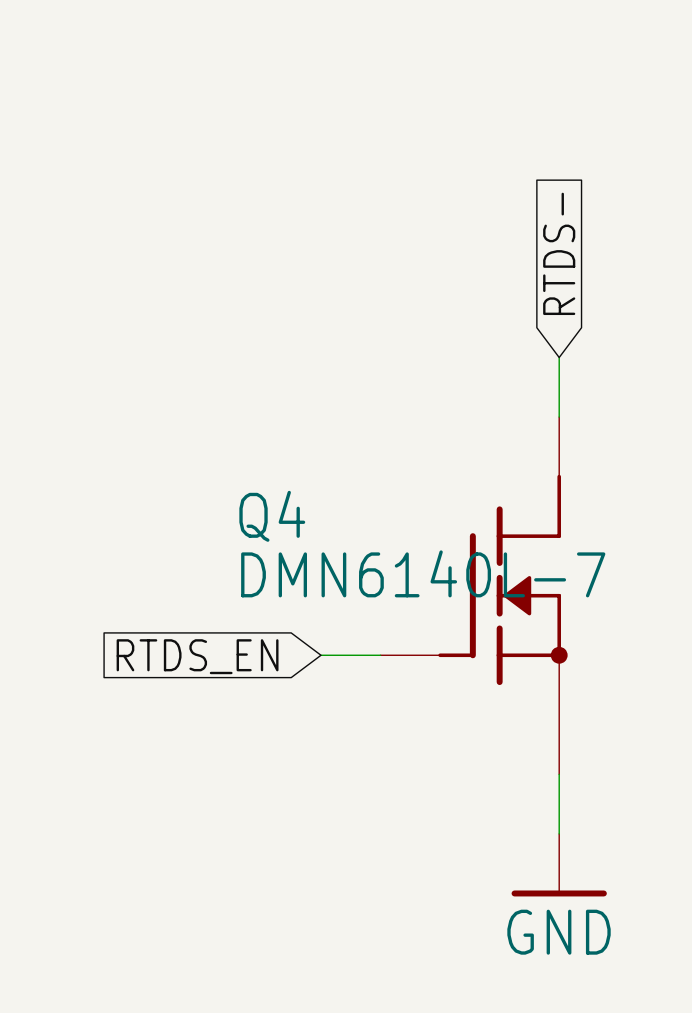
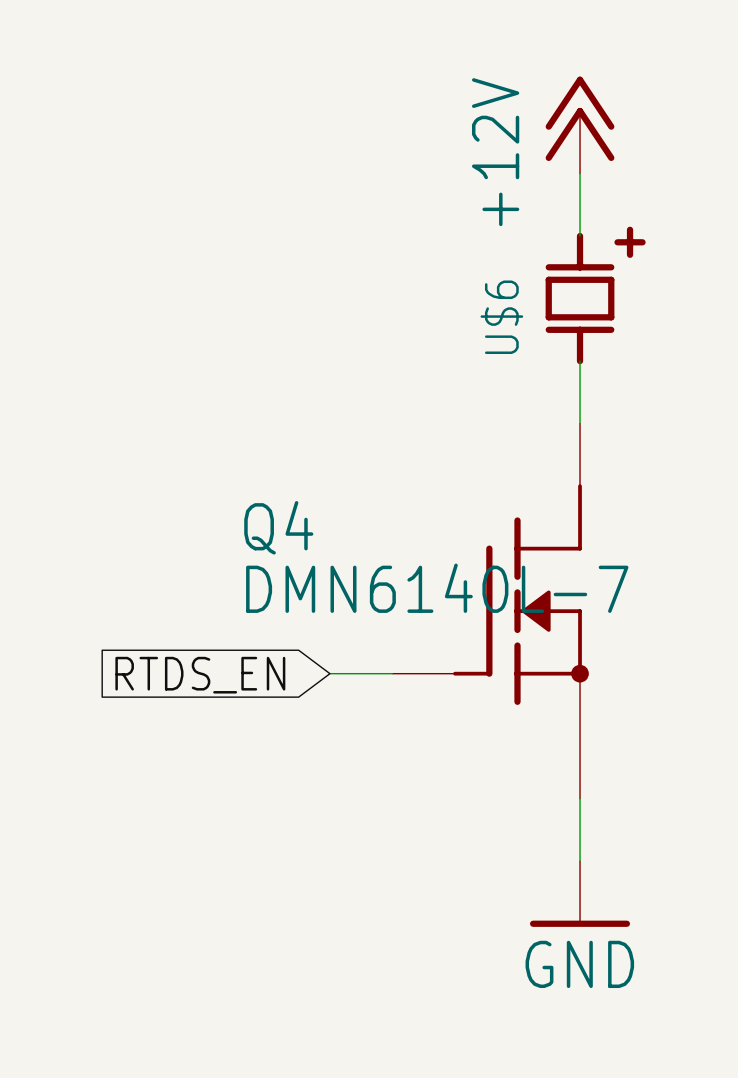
power symbol: none -> +12V (580, 125)
wire: none -> (580, 173) (580, 236)
global label: RTDS- (559, 253) -> none
U$6: none -> (595, 295)

